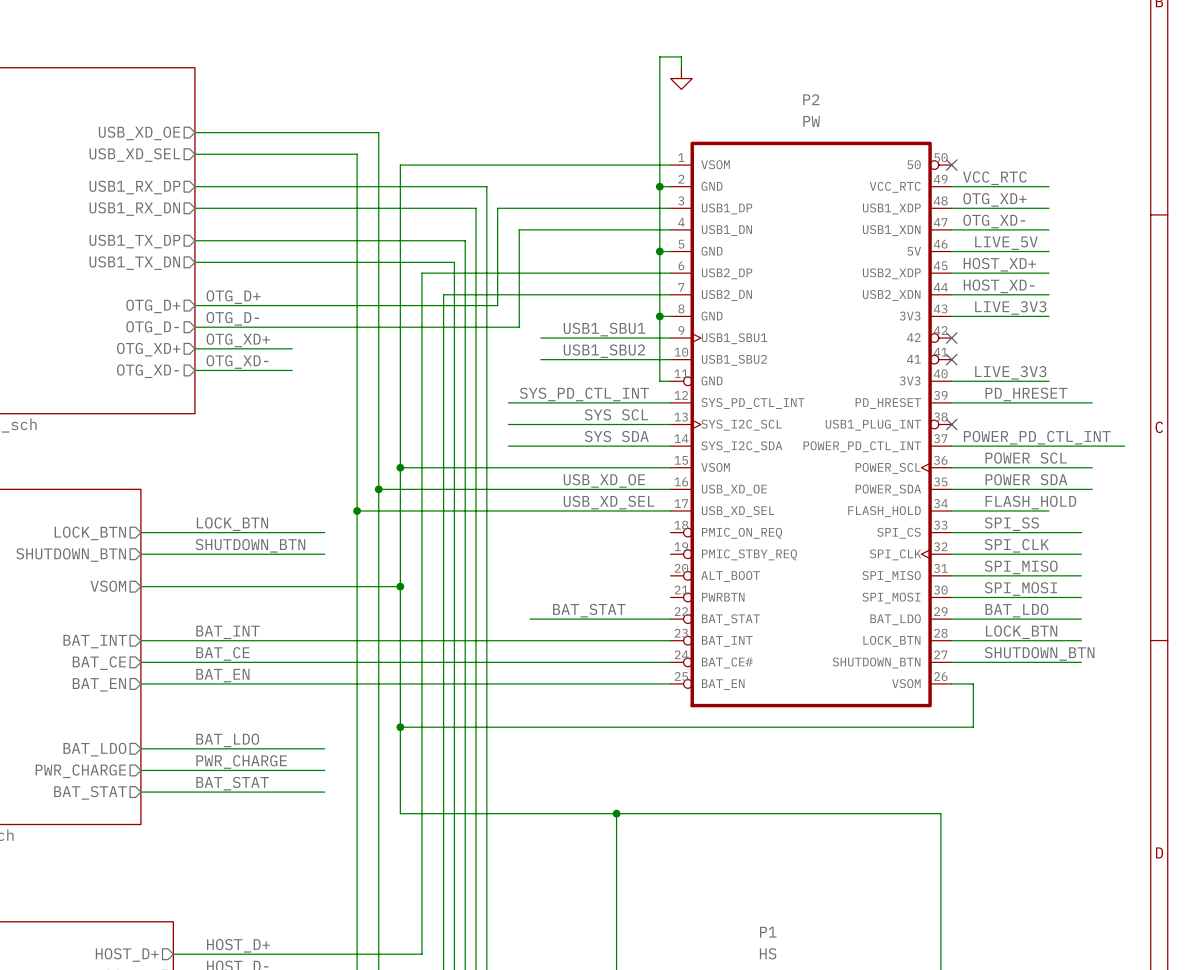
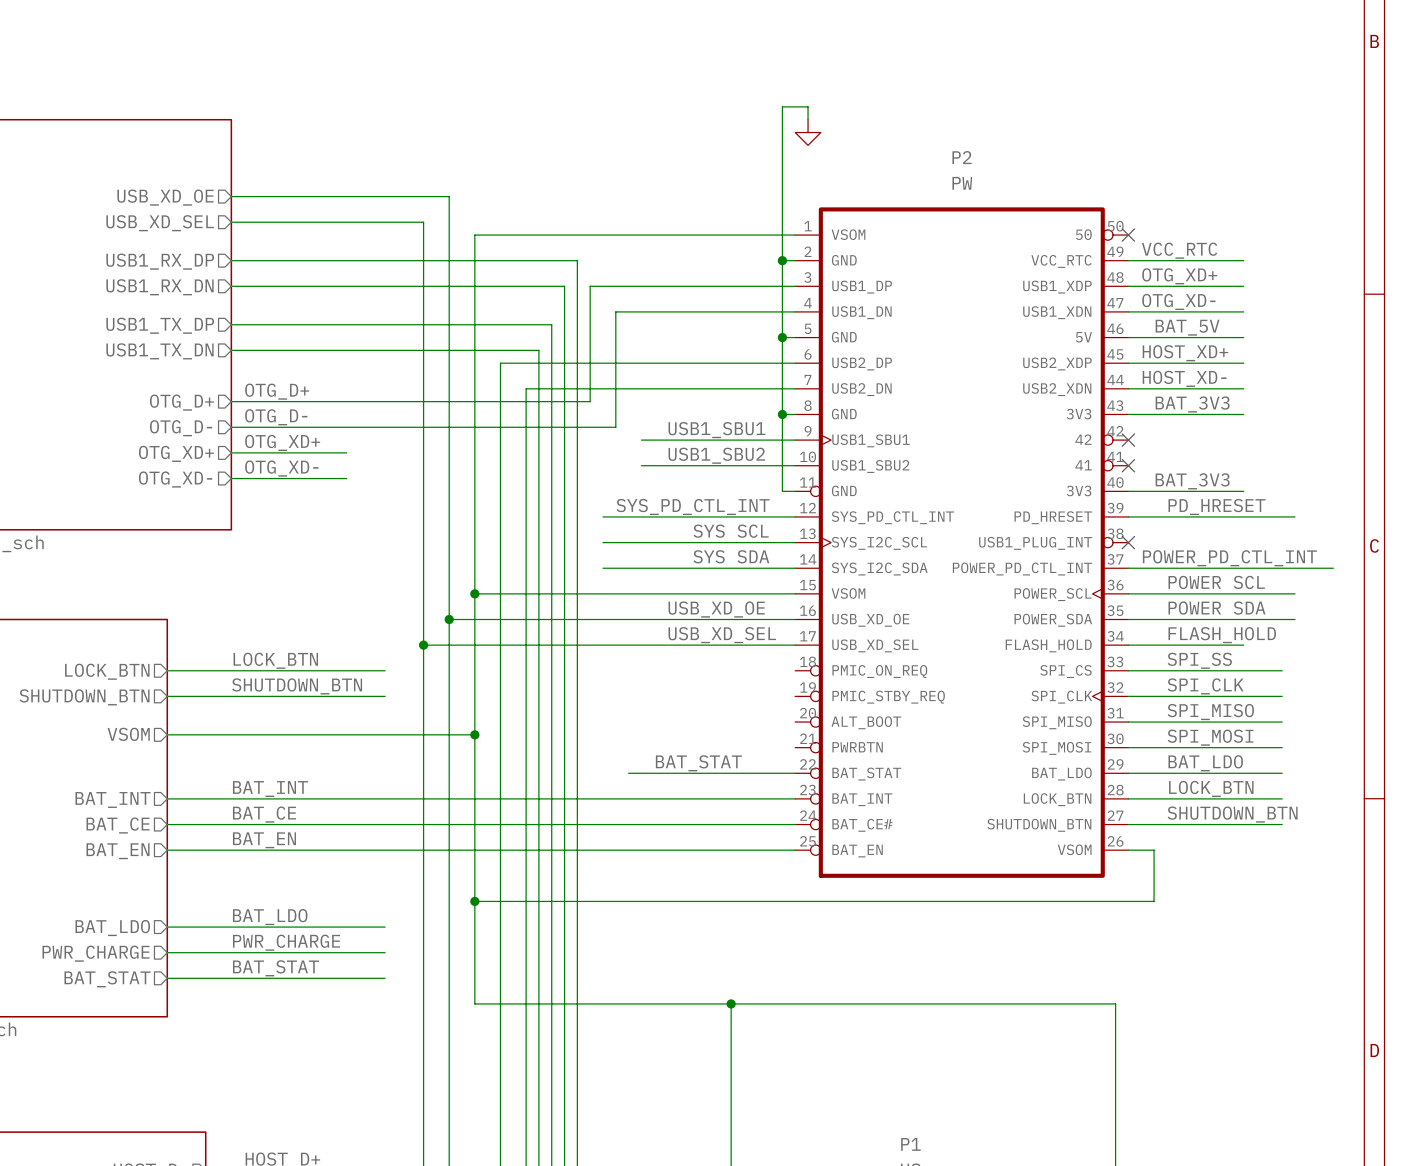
label: LIVE_5V (1006, 243) -> BAT_5V (1187, 327)
label: LIVE_3V3 (1010, 307) -> BAT_3V3 (1192, 404)
label: LIVE_3V3 (1010, 372) -> BAT_3V3 (1192, 481)

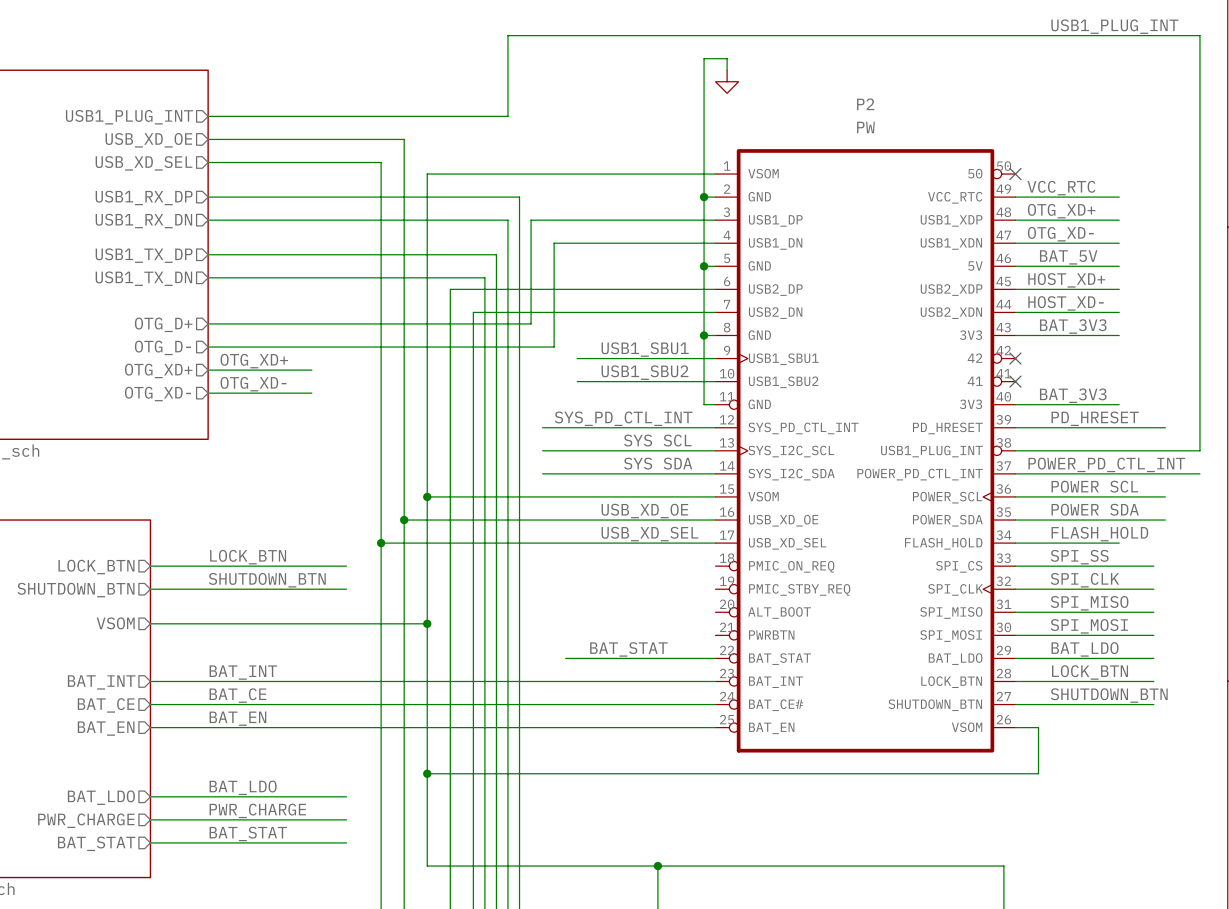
label: none -> USB1_PLUG_INT (1114, 26)
wire: none -> (208, 116) (507, 116) (507, 35) (1199, 35) (1199, 450) (1015, 450)
hierarchical label: none -> USB1_PLUG_INT (129, 117)
label: OTG_D+ (277, 391) -> none
label: OTG_D- (276, 417) -> none
no-connect mark: (1128, 542) -> none

